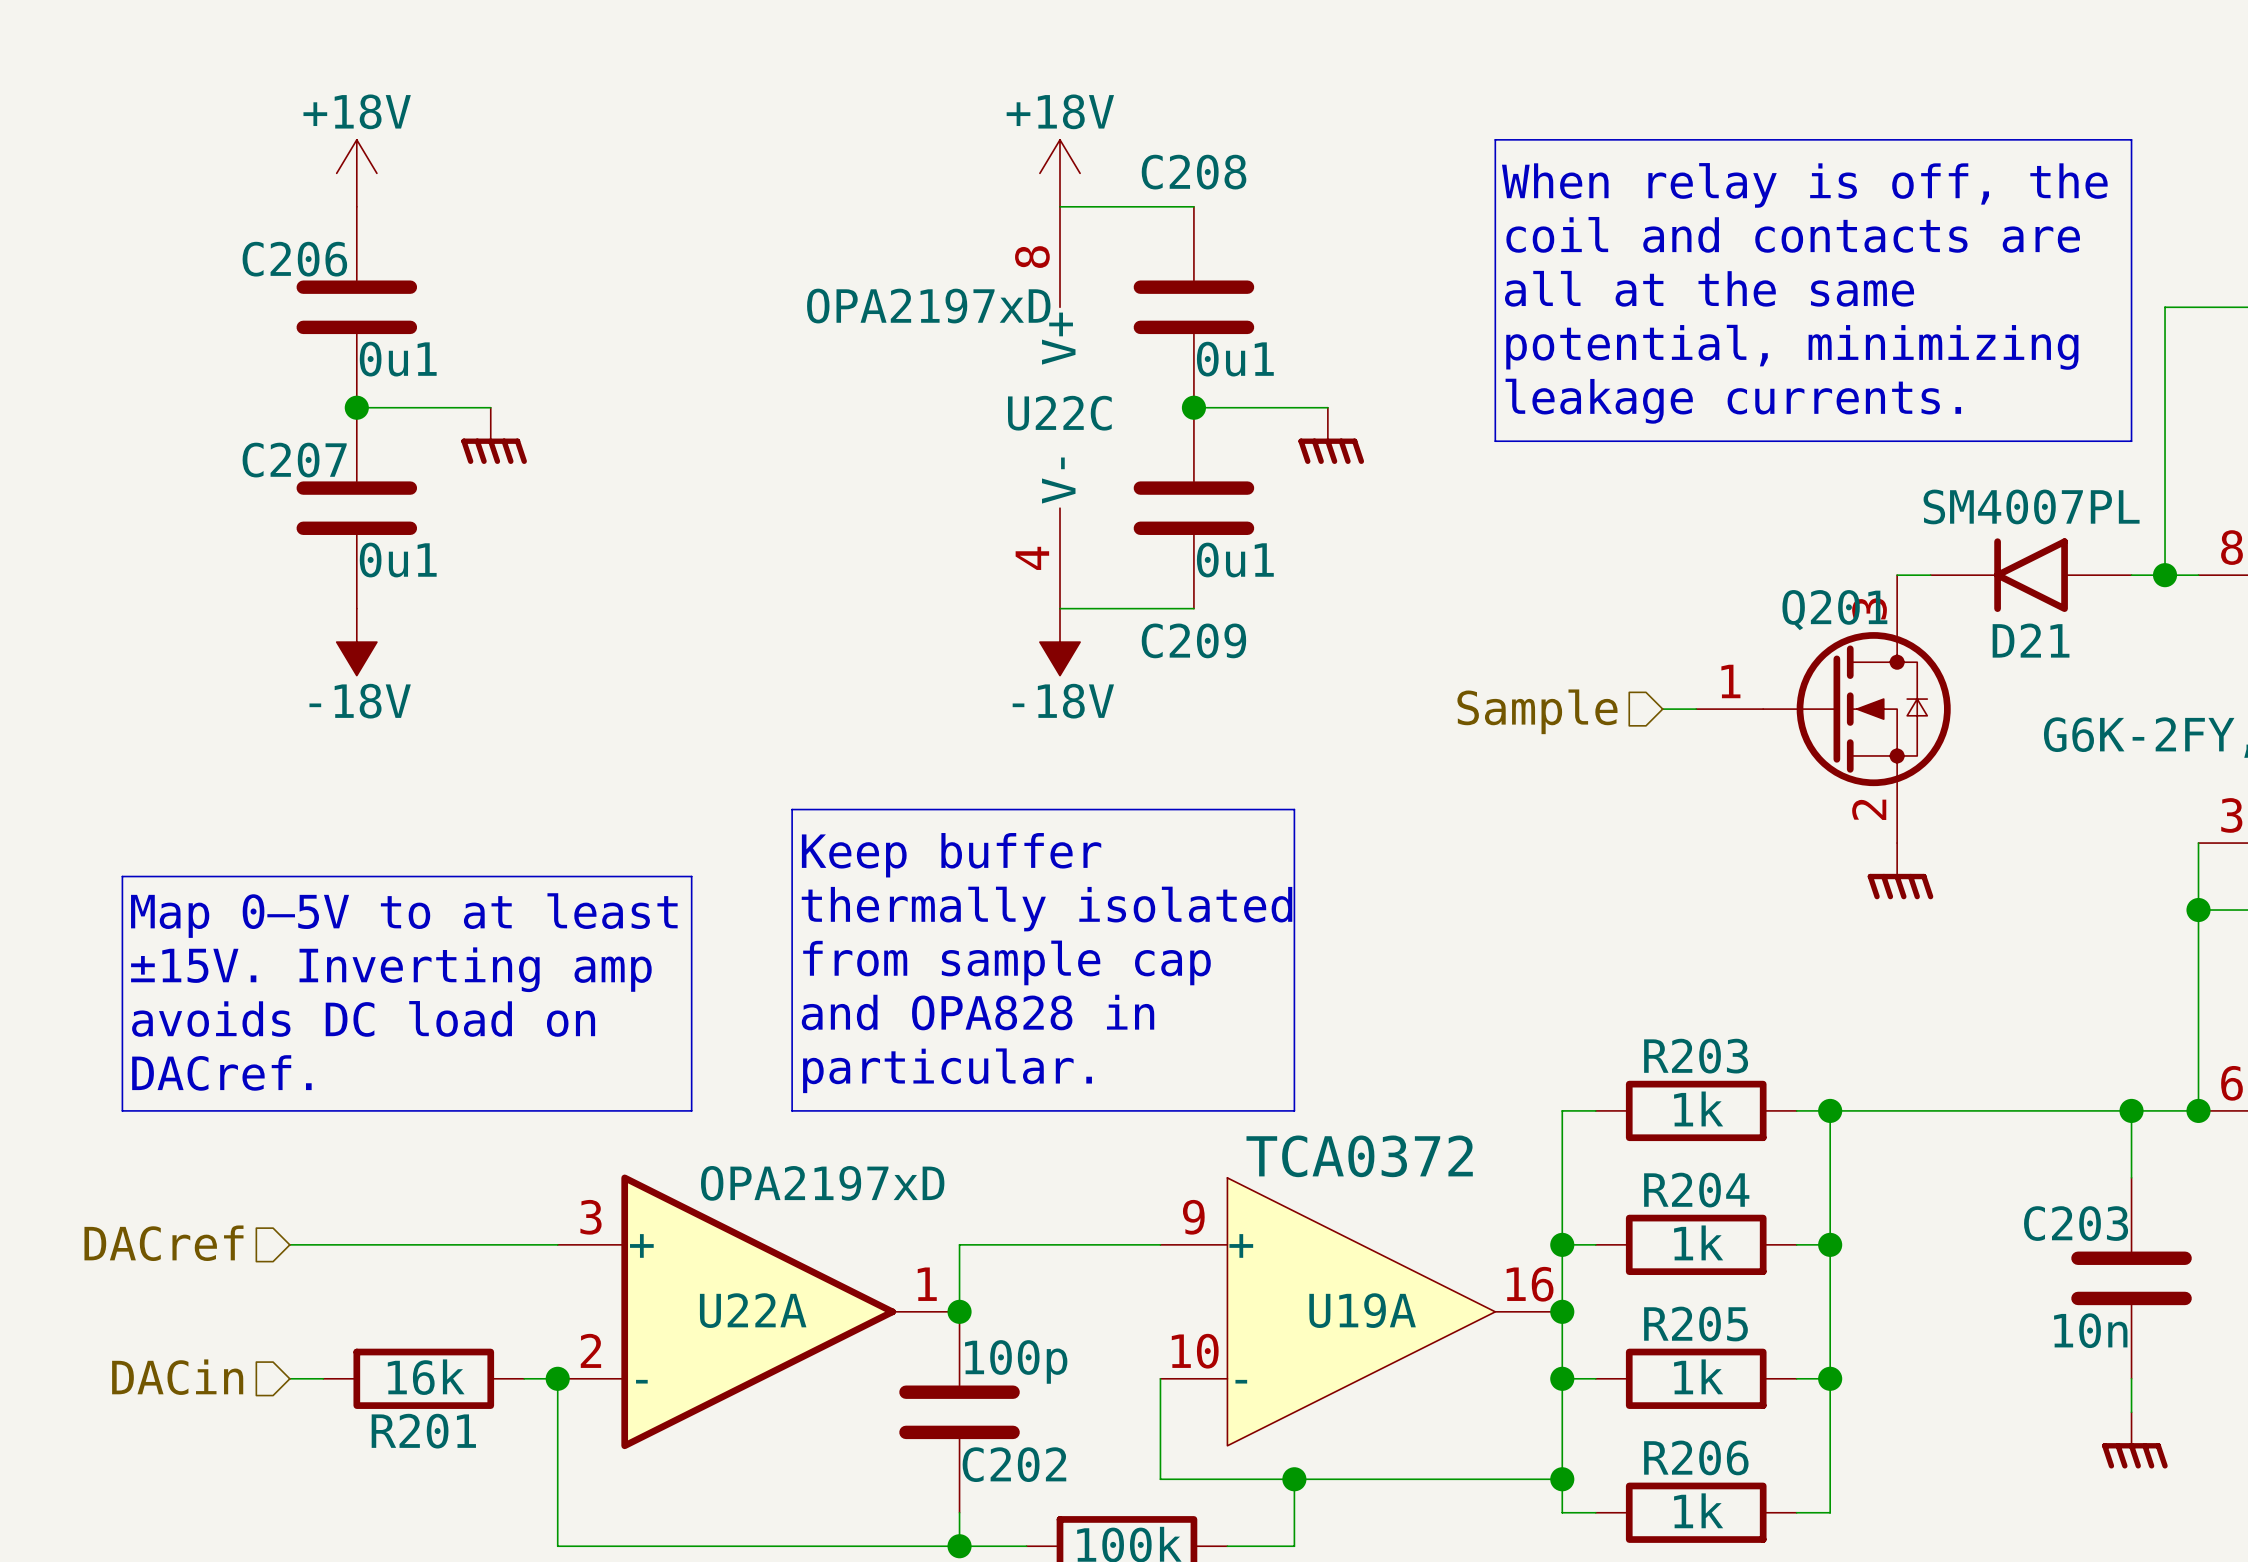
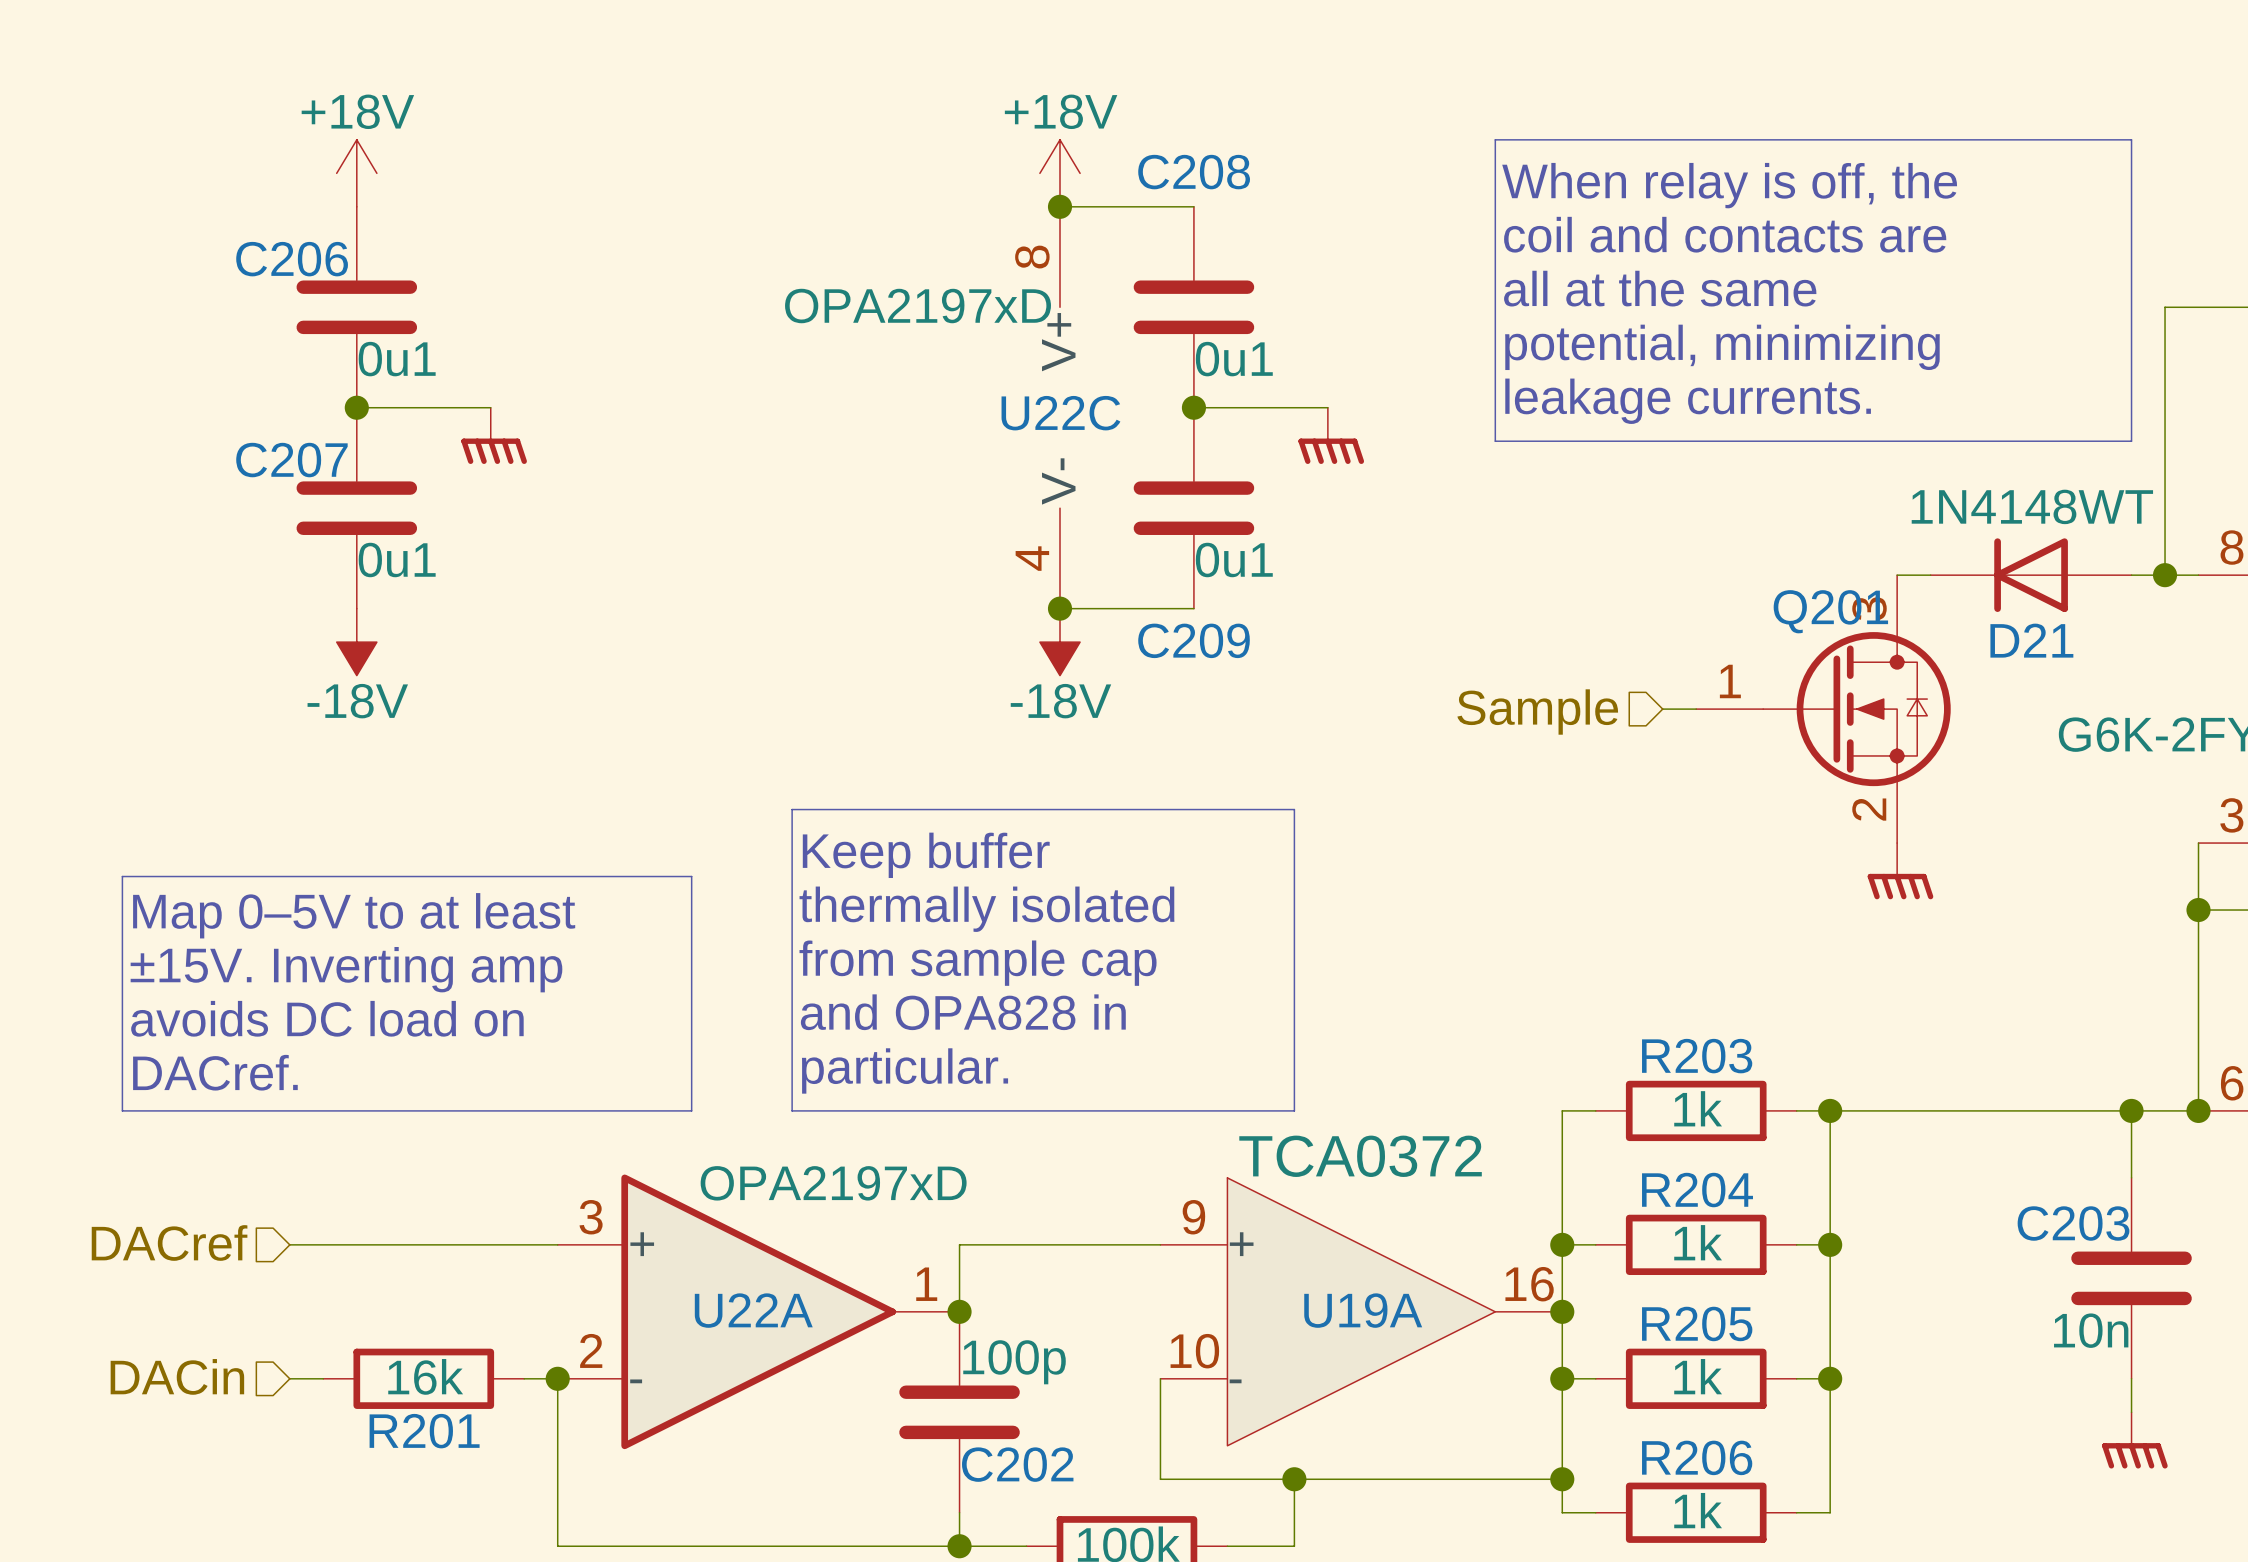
junction: none -> (1060, 206)
D21 value: SM4007PL (2031, 506) -> 1N4148WT (2032, 506)
D21 symbol: [1930, 538, 2132, 612] -> [1930, 538, 2132, 612]
junction: none -> (1060, 608)

